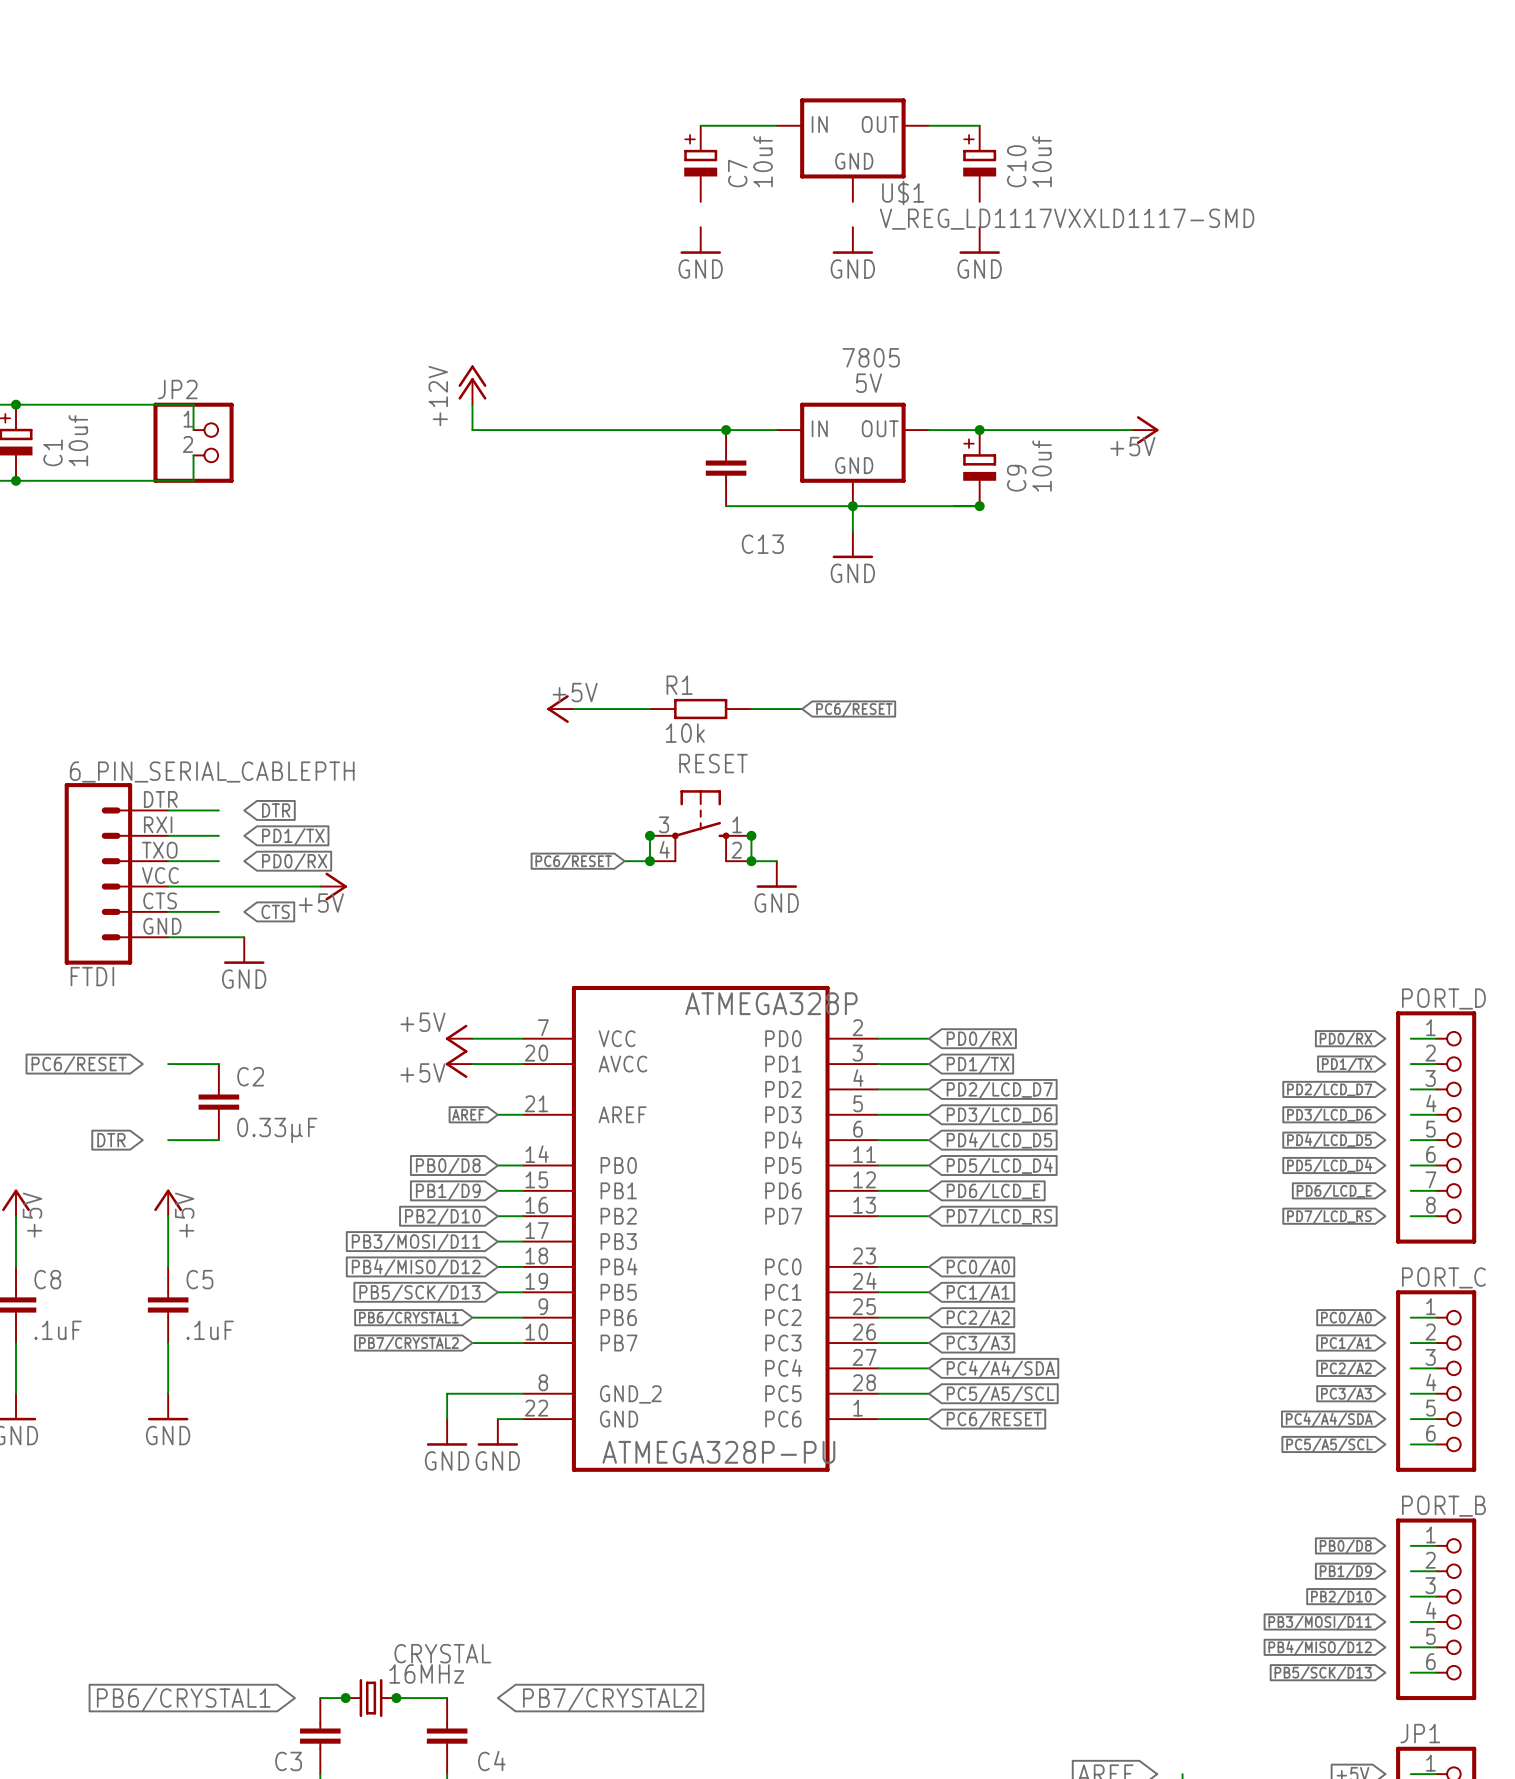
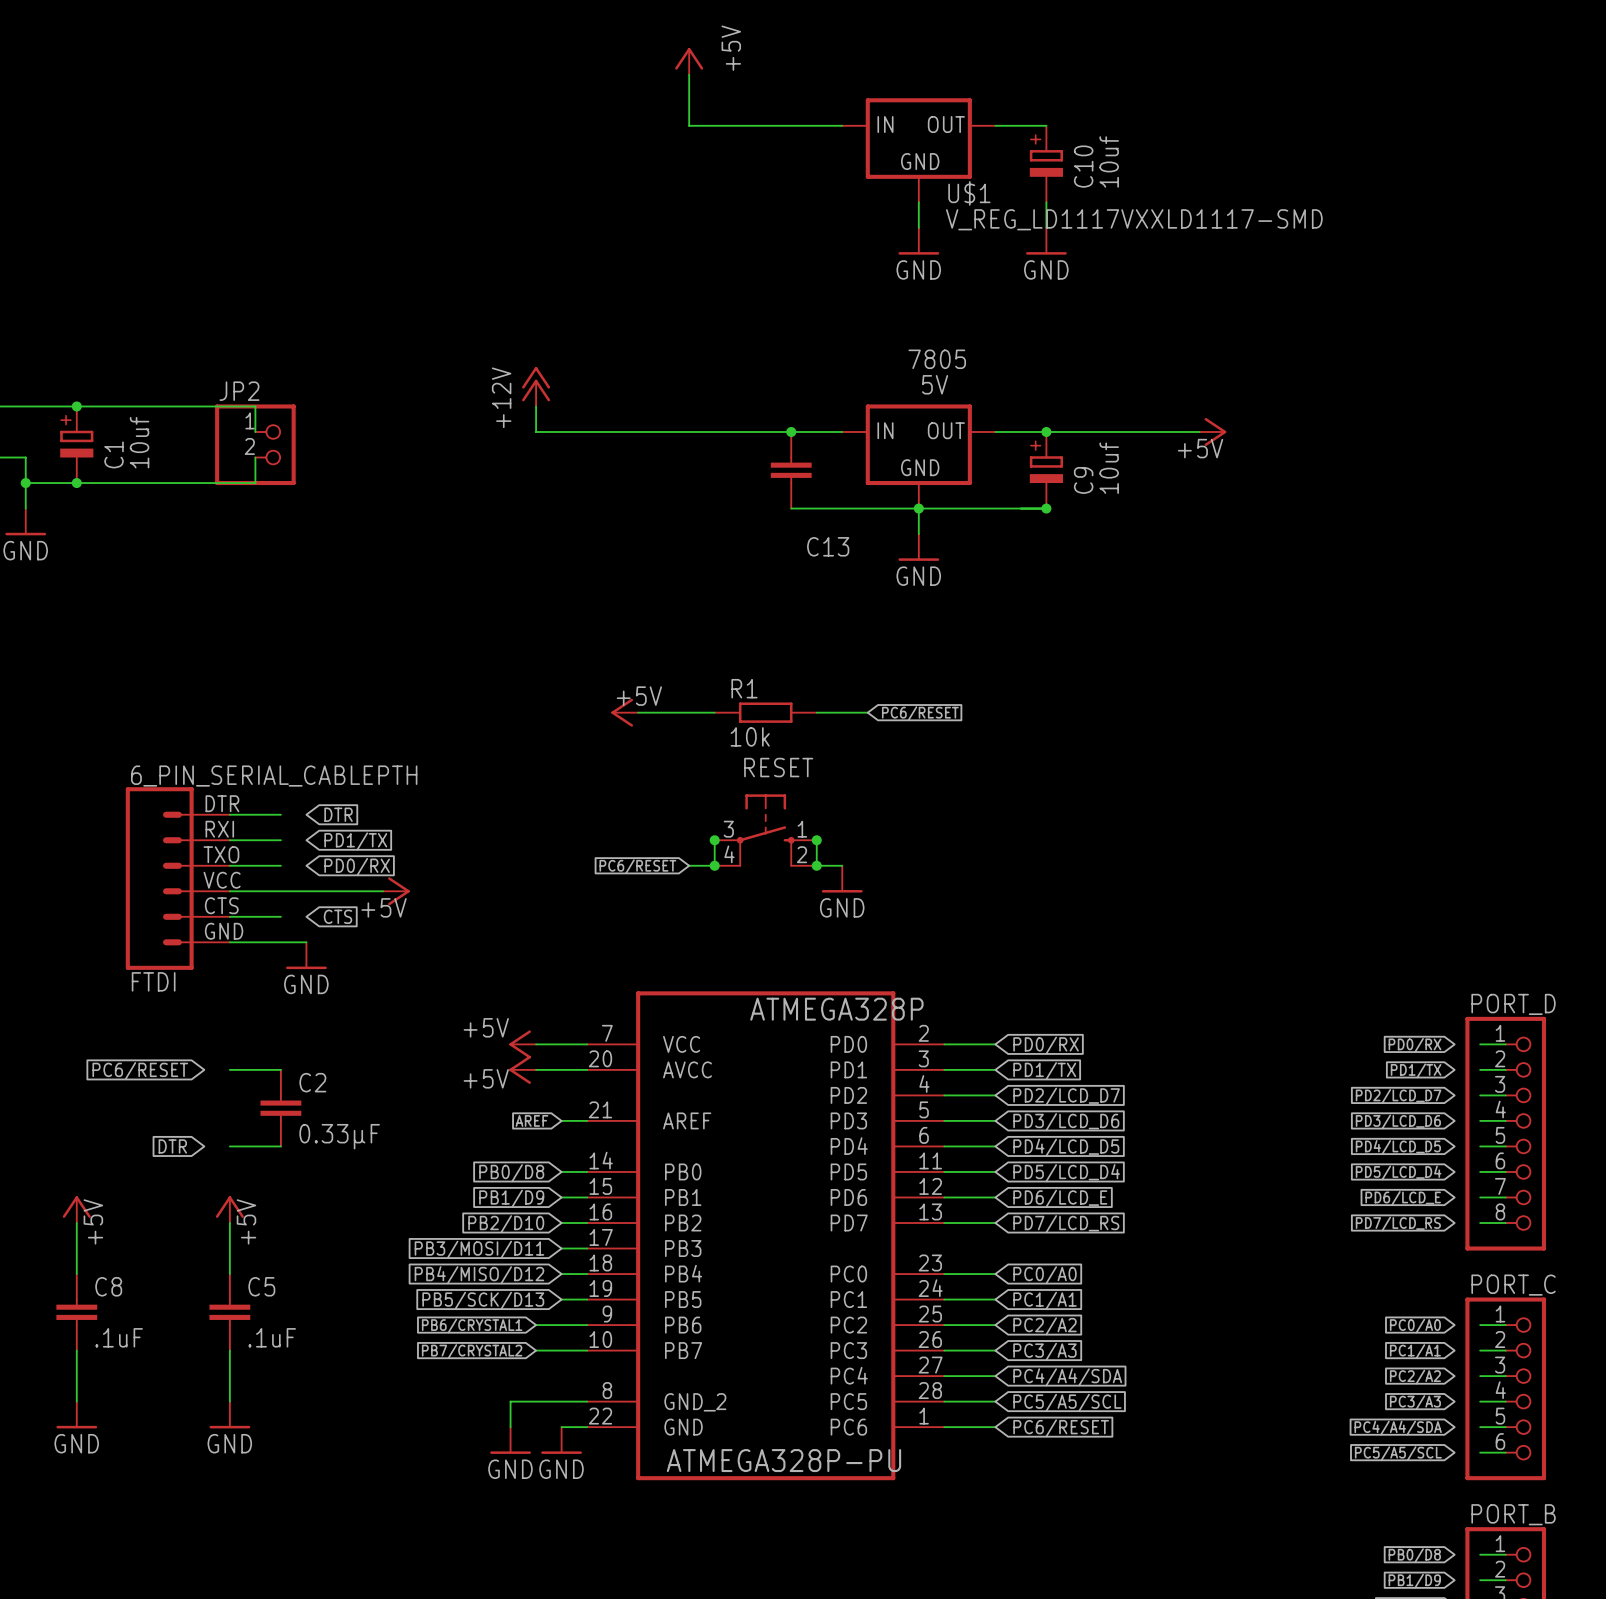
power symbol: none -> +5V (689, 61)
wire: none -> (689, 74) (689, 125) (765, 125)
C7: 10uf (700, 163) -> none
wire: none -> (918, 202) (918, 227)
wire: none -> (1046, 202) (1046, 227)
power symbol: GND (700, 240) -> none

